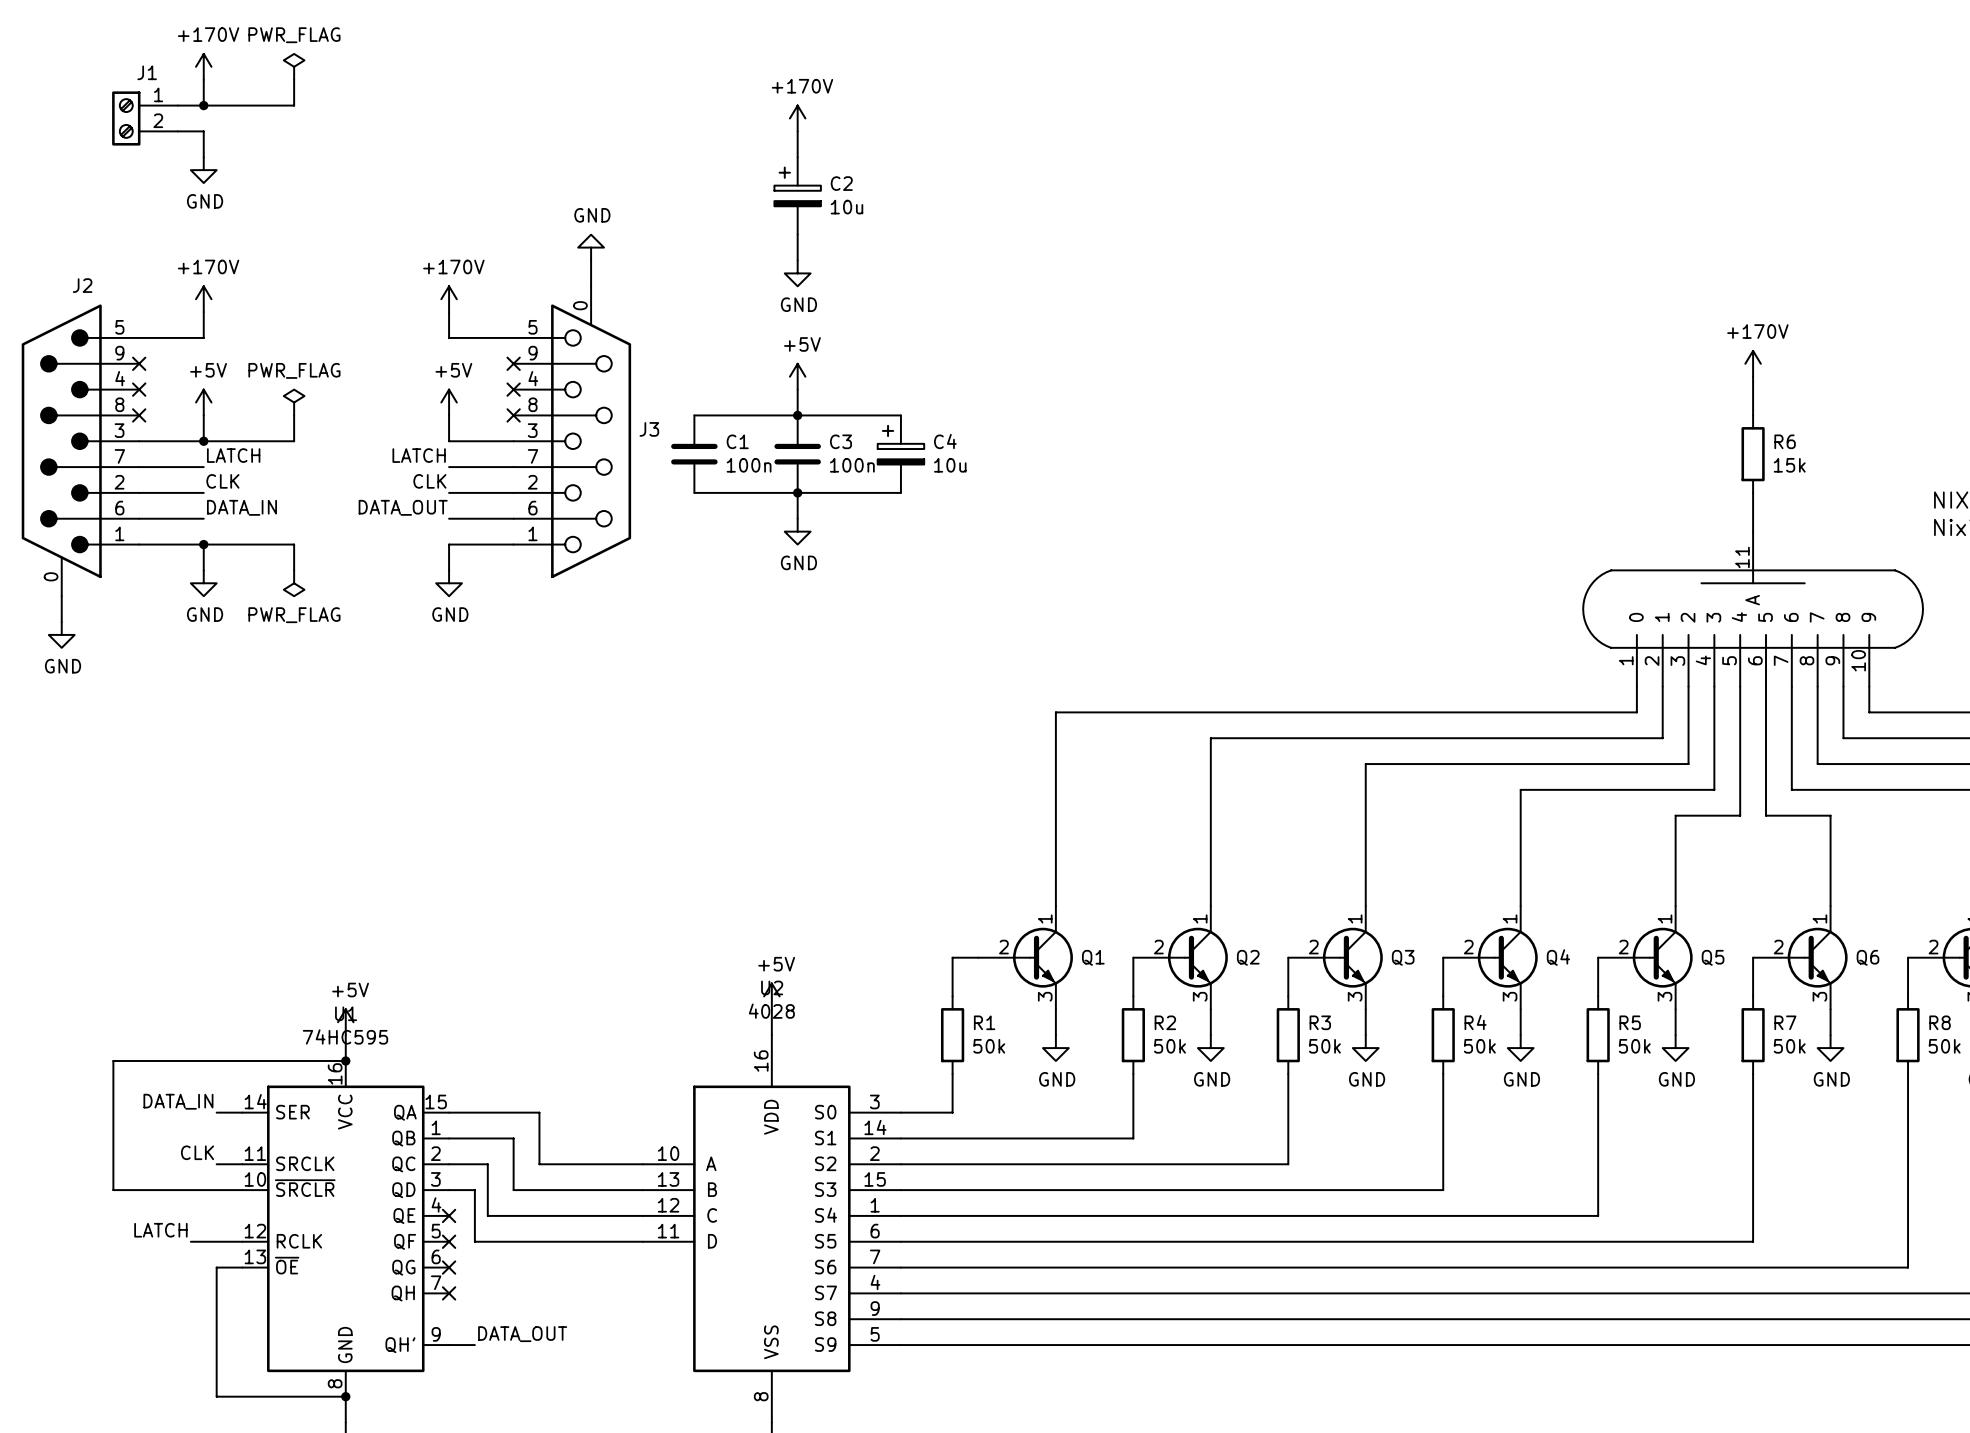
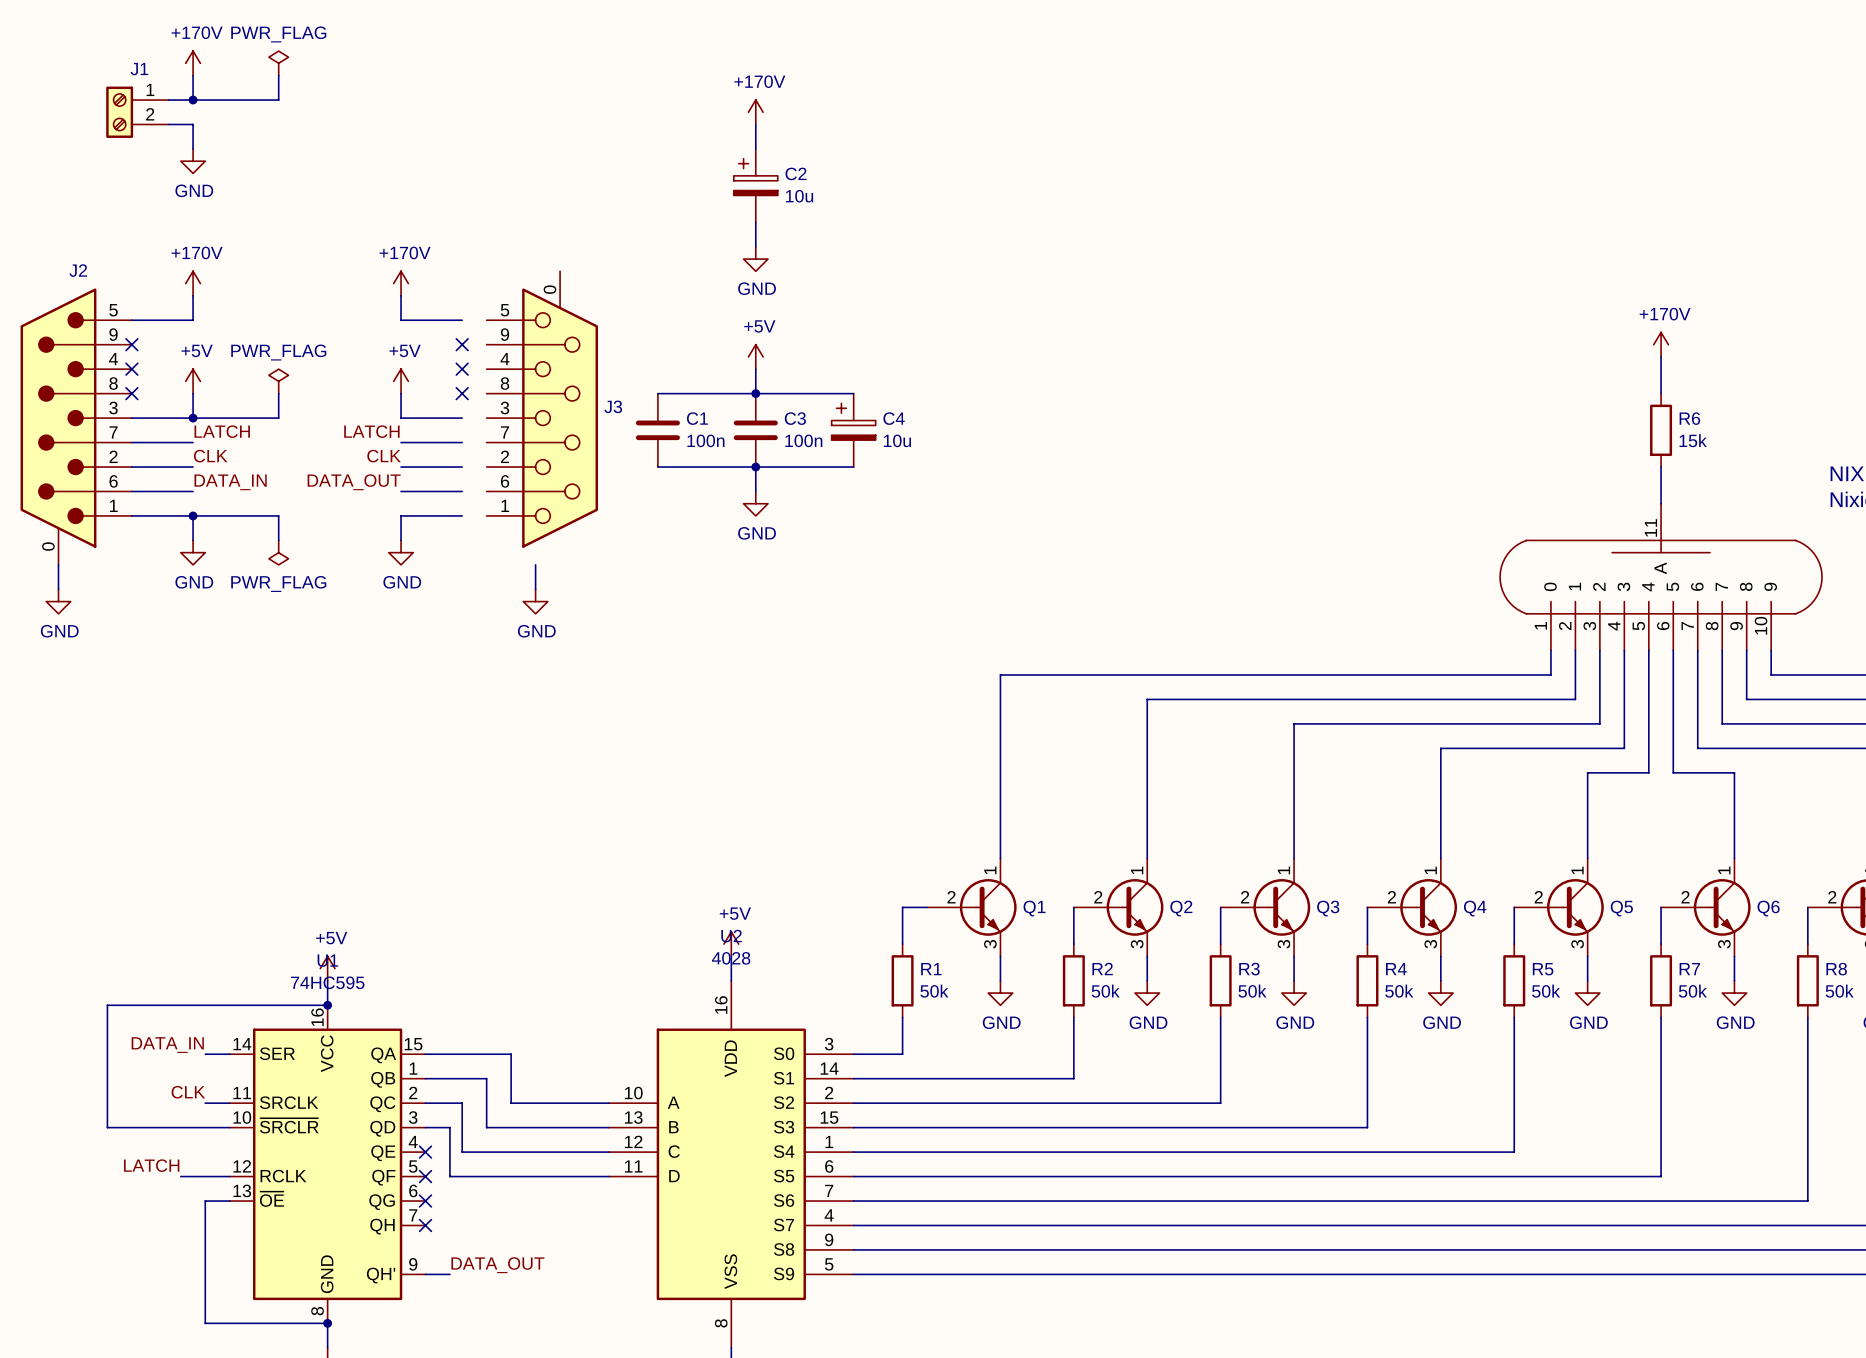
power symbol: GND (591, 247) -> none
wire: (591, 260) (591, 286) -> none
power symbol position: +170V (449, 299) -> +170V (401, 283)
wire: (449, 312) (449, 337) -> (401, 295) (401, 320) (425, 320)
wire: (487, 337) (513, 337) -> none
no-connect mark: none -> (462, 344)
no-connect mark: (513, 363) -> none
no-connect mark: none -> (462, 369)
no-connect mark: (513, 389) -> none
power symbol position: +5V (449, 402) -> +5V (401, 381)
wire: (449, 415) (449, 441) -> (401, 393) (401, 418) (425, 418)
no-connect mark: none -> (462, 393)
no-connect mark: (513, 415) -> none
wire: (487, 441) (513, 441) -> none
label position: LATCH (419, 455) -> LATCH (371, 431)
wire: (487, 467) (513, 467) -> (401, 442) (425, 442)
label position: CLK (429, 481) -> CLK (384, 456)
wire: (487, 492) (513, 492) -> (401, 467) (425, 467)
label position: DATA_OUT (403, 507) -> DATA_OUT (354, 482)
wire: (487, 518) (513, 518) -> (401, 491) (425, 491)
wire: (449, 544) (449, 570) -> (425, 515) (401, 515) (401, 540)
wire: (487, 544) (513, 544) -> none
power symbol position: GND (449, 583) -> GND (401, 552)
wire: none -> (535, 564) (535, 589)
power symbol: none -> GND (535, 601)

